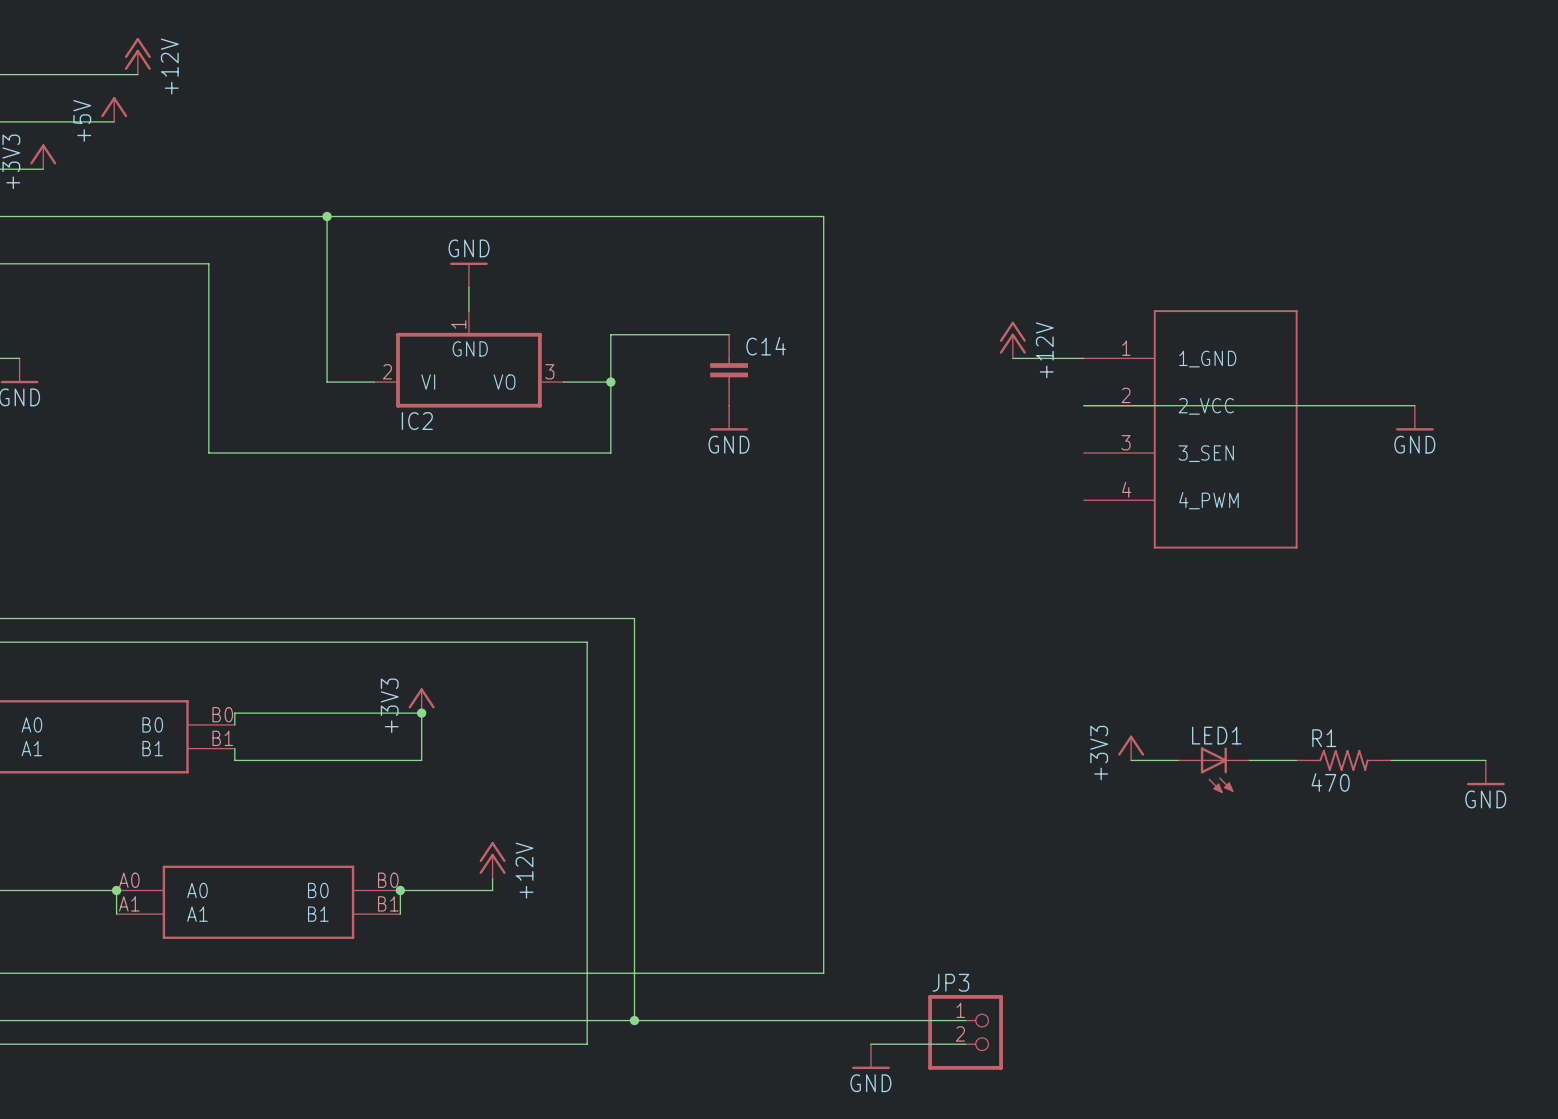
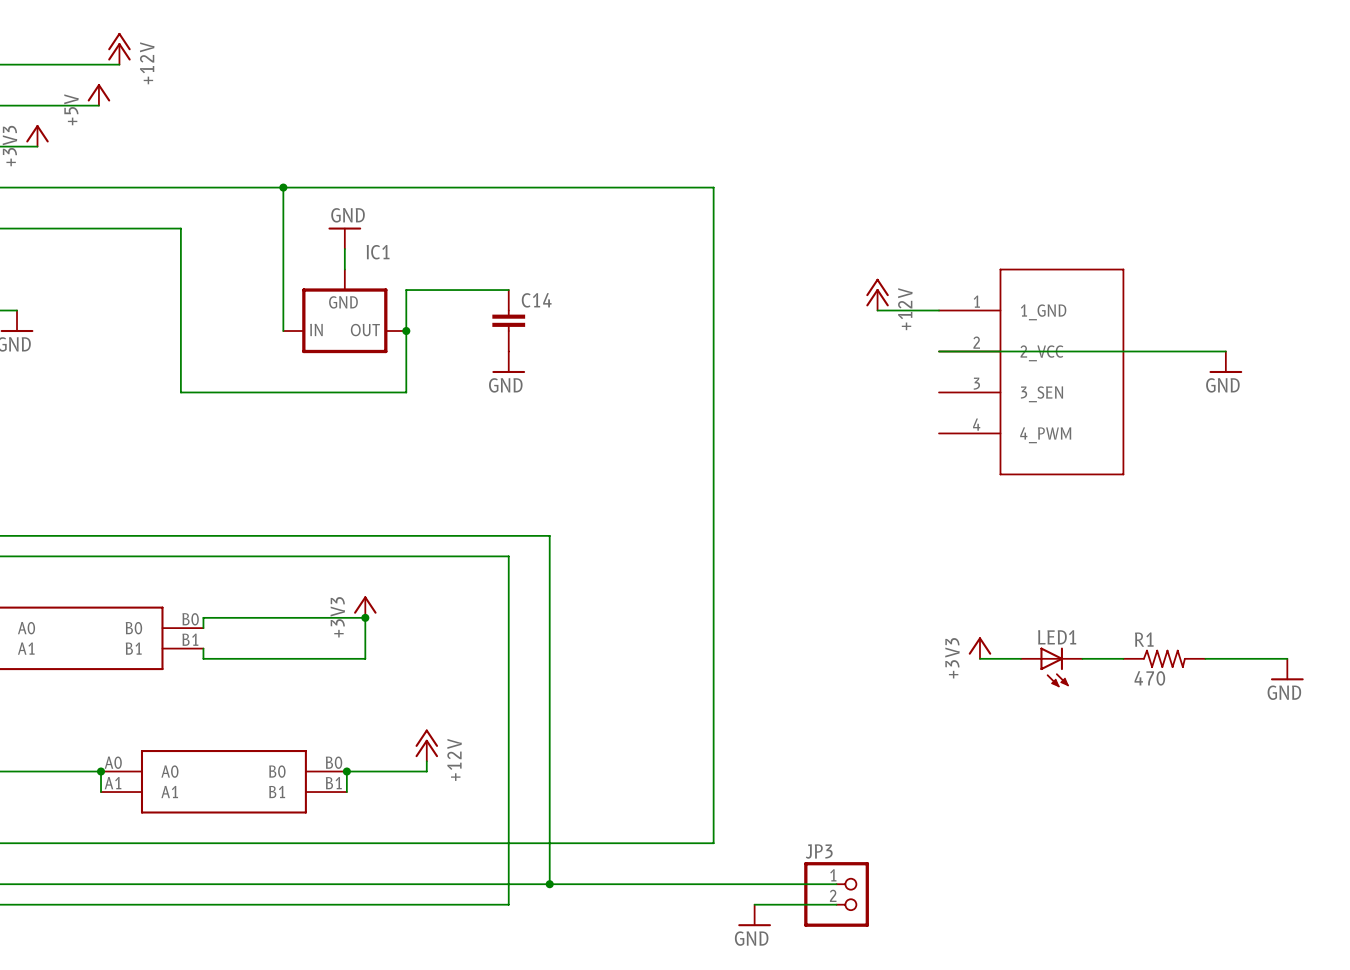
power symbol position: GND (468, 275) -> GND (344, 238)
wire: (468, 287) (468, 311) -> (344, 249) (344, 269)
wire: (729, 334) (610, 334) (610, 452) (468, 452) -> (508, 290) (406, 290) (406, 392)
IC1: none -> (344, 311)
IC2: (468, 359) -> none
C14 position: (729, 370) -> (508, 320)
junction: none -> (406, 331)
wire: (563, 382) (610, 382) -> none
junction: (610, 382) -> none
power symbol: none -> GND (508, 362)
power symbol: GND (729, 418) -> none

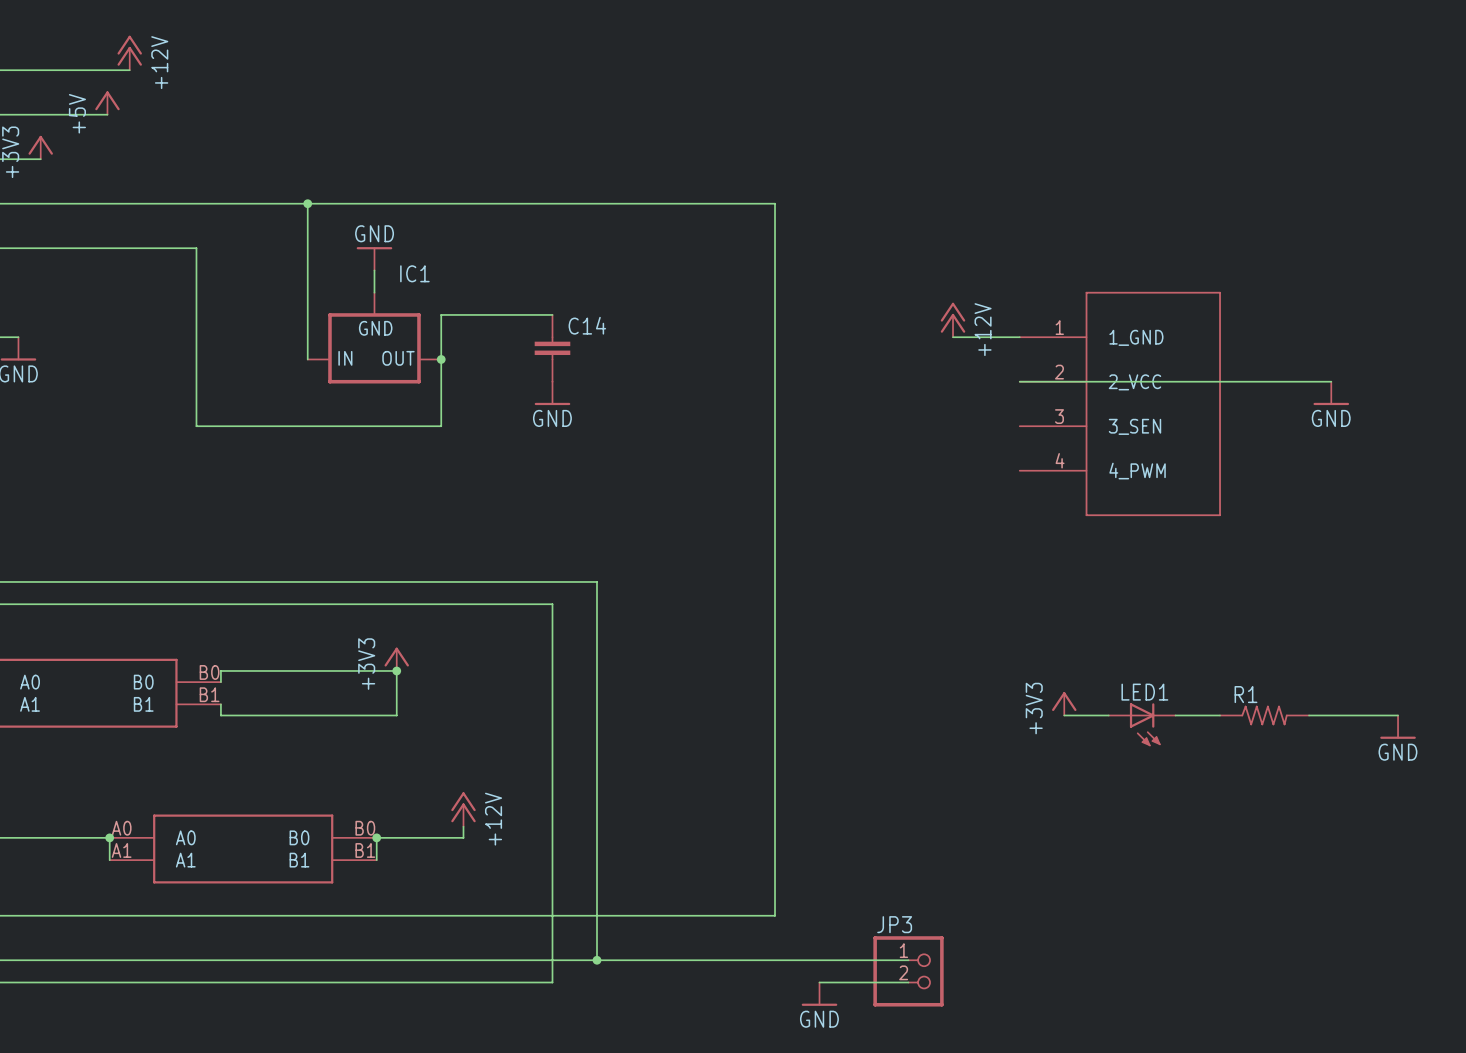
R1 value: 470 (1149, 678) -> none

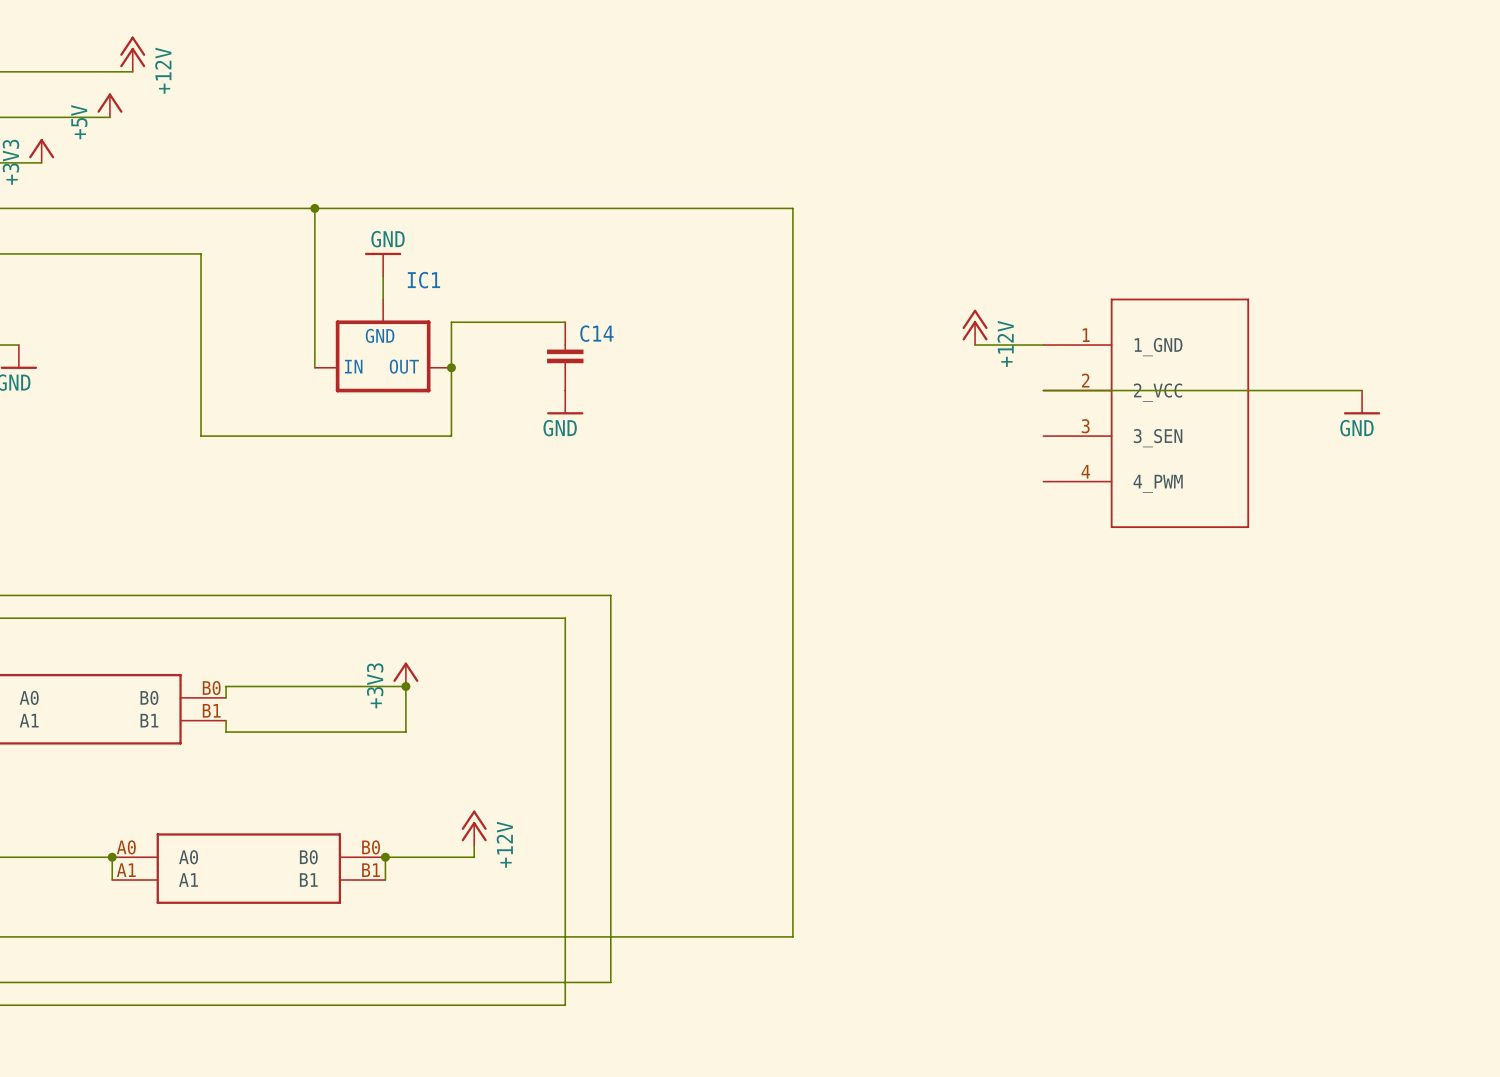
power symbol: +3V3 (1064, 703) -> none
wire: (1064, 715) (1108, 715) -> none
wire: (1175, 715) (1220, 715) -> none
R1: (1264, 715) -> none
wire: (1309, 715) (1398, 715) -> none
LED1: (1142, 724) -> none
power symbol: GND (1398, 727) -> none
wire: (596, 960) (908, 960) -> none
junction: (596, 960) -> none
JP3: (908, 971) -> none
wire: (819, 982) (908, 982) -> none
power symbol: GND (819, 994) -> none

